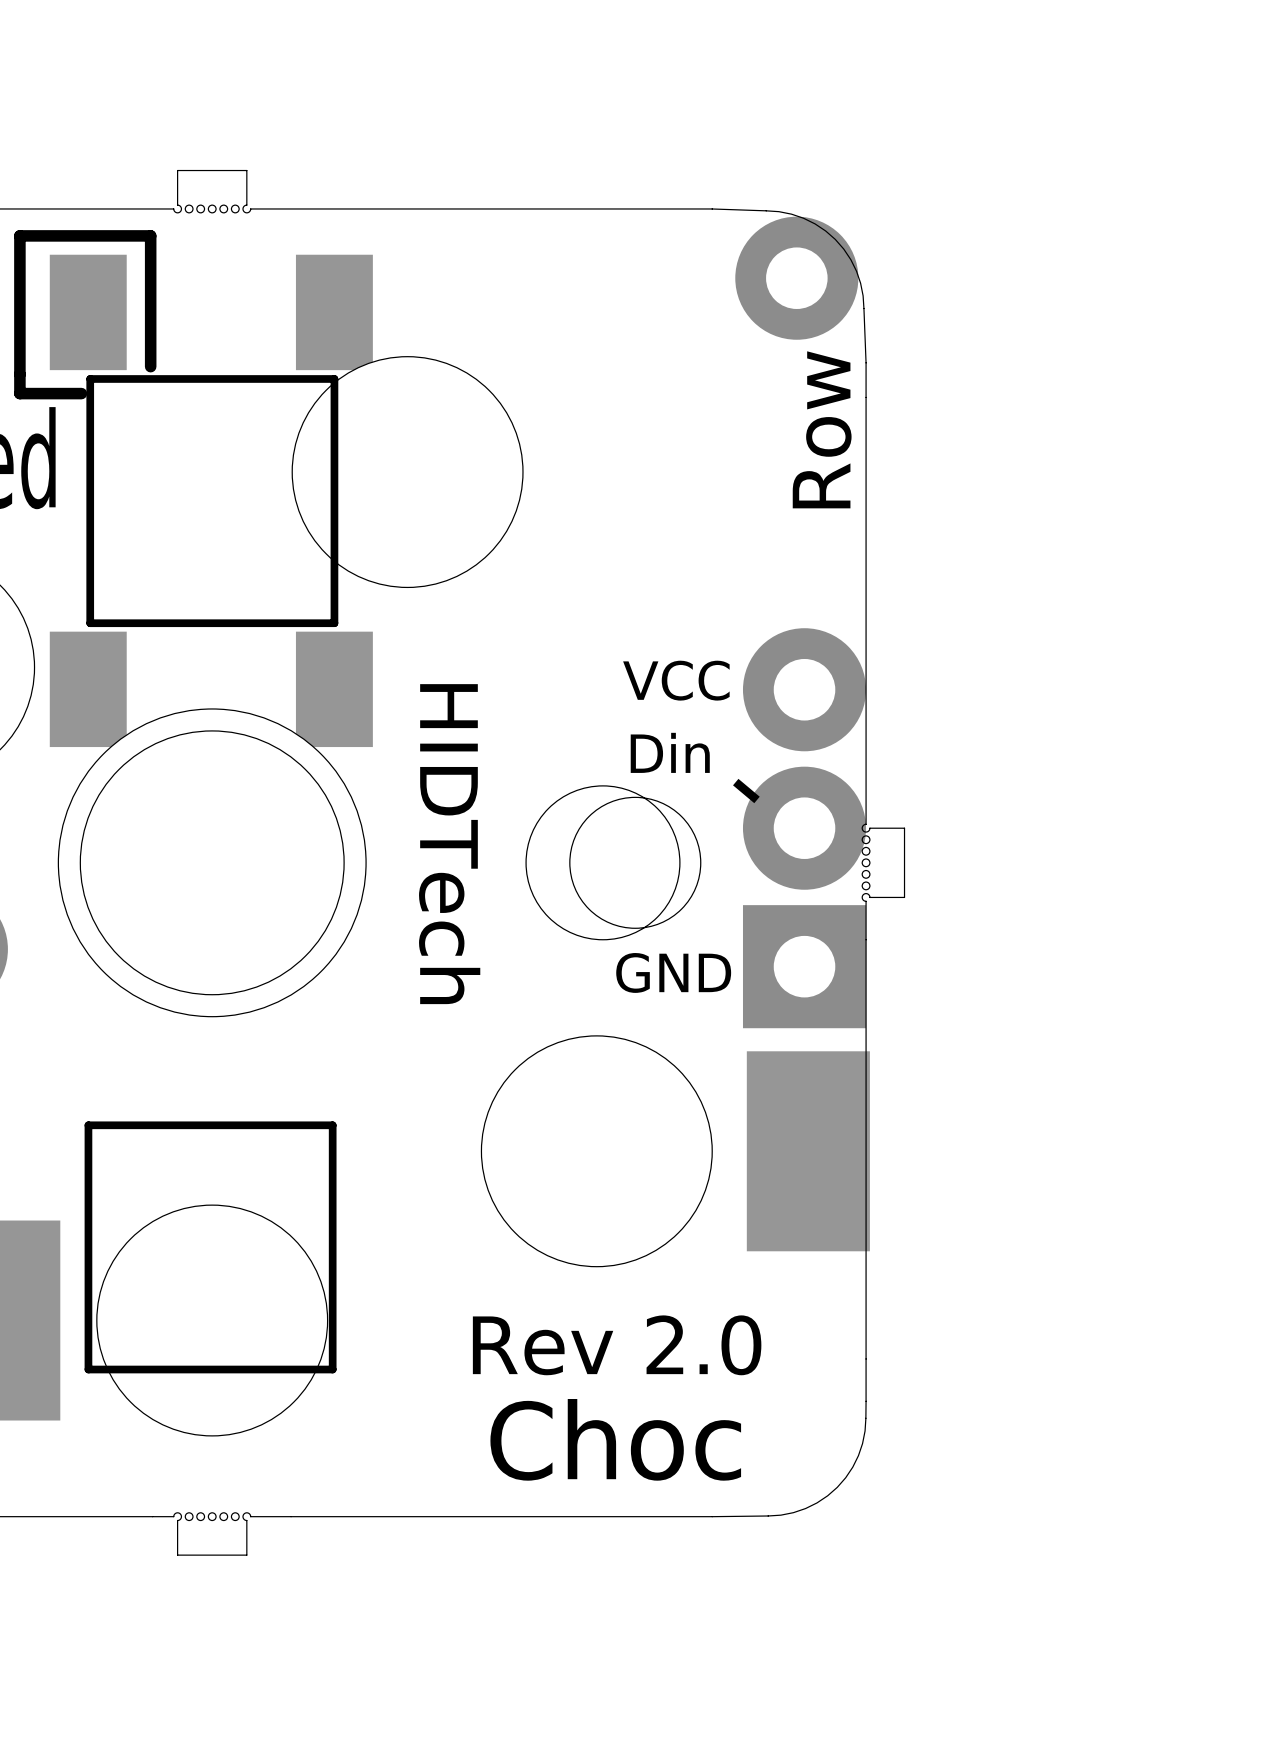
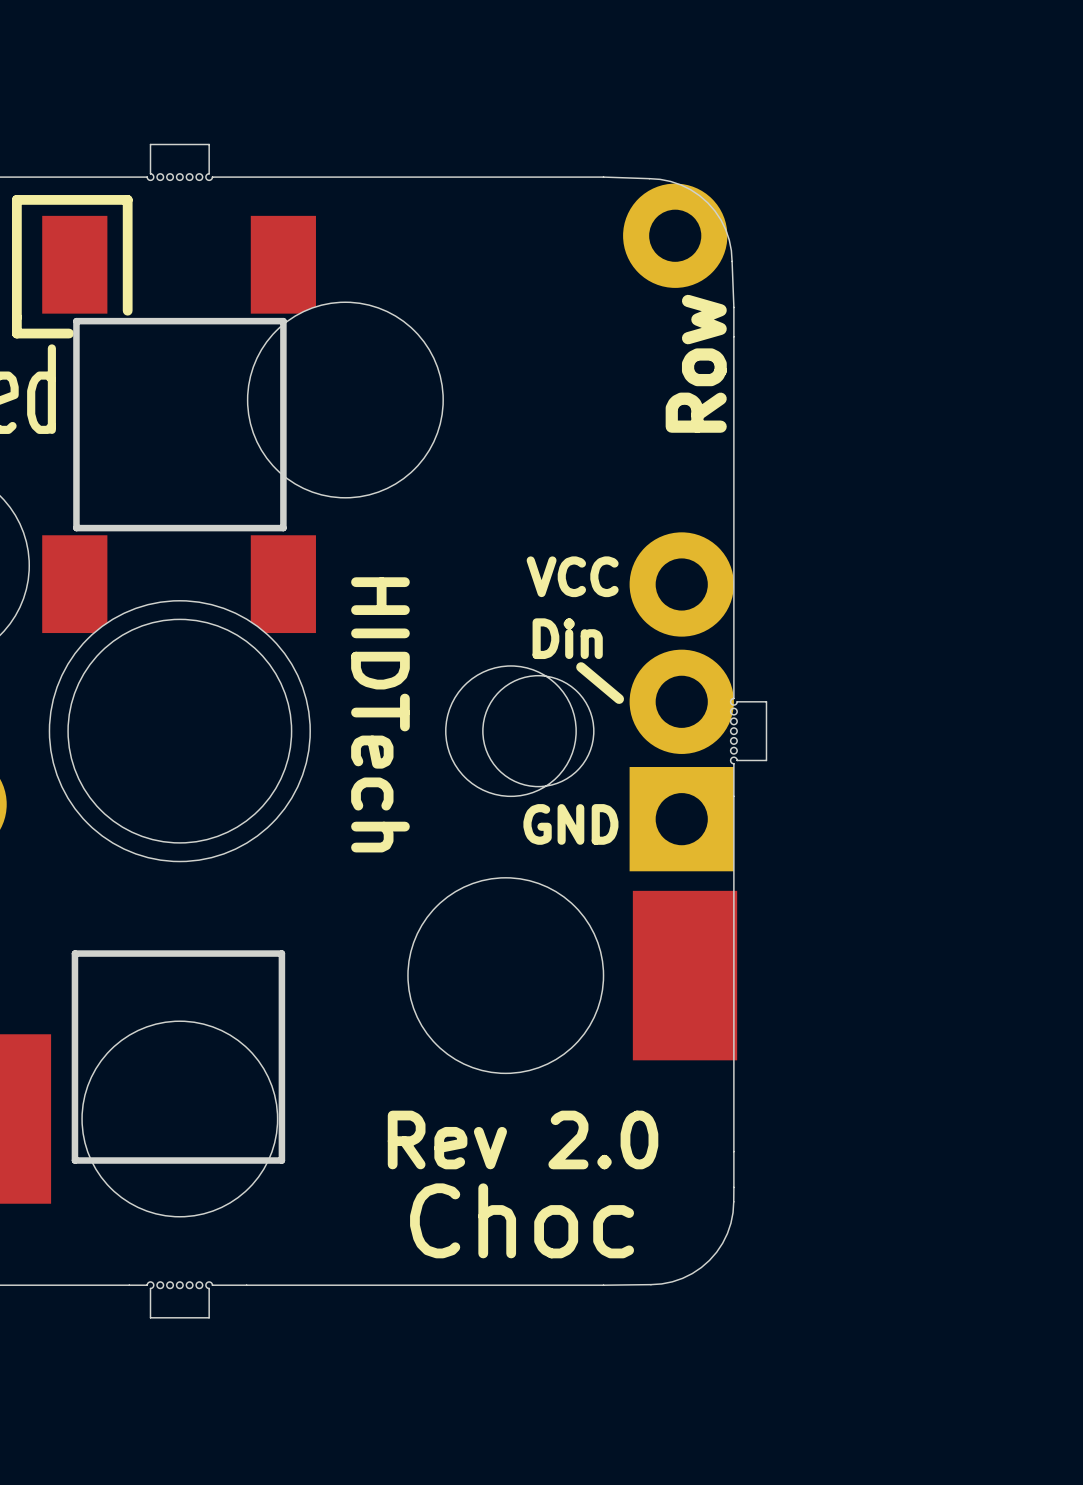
text position: - (746, 791) -> - (600, 683)

